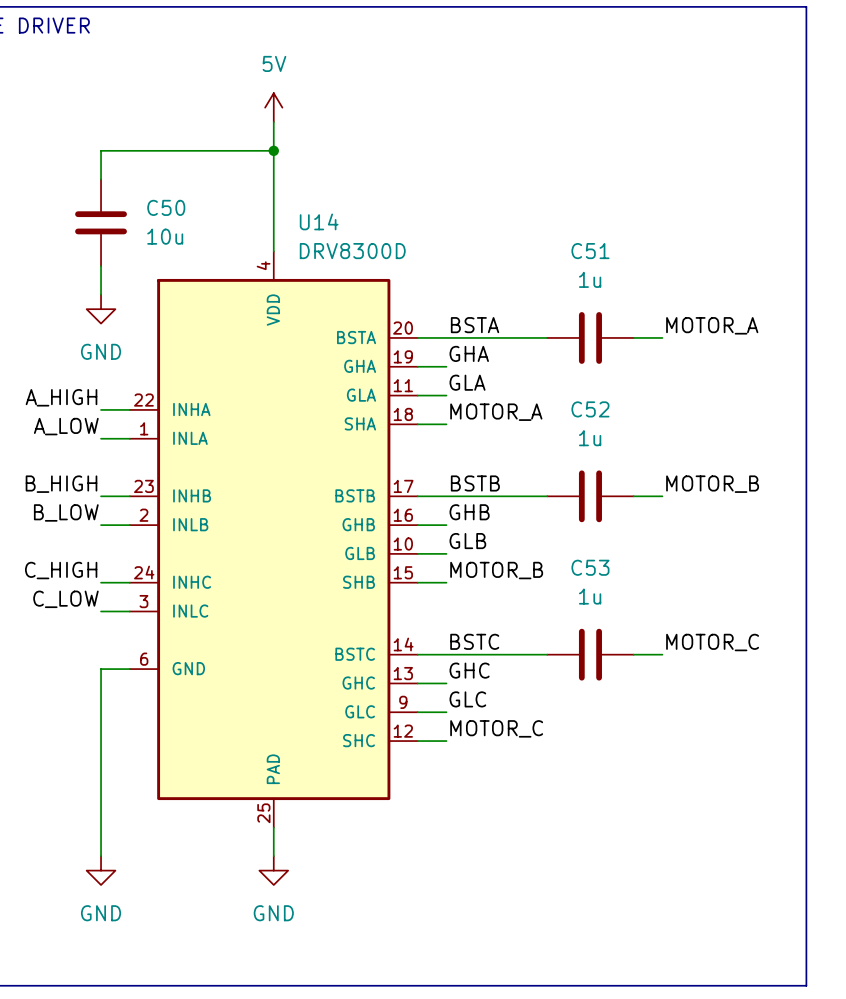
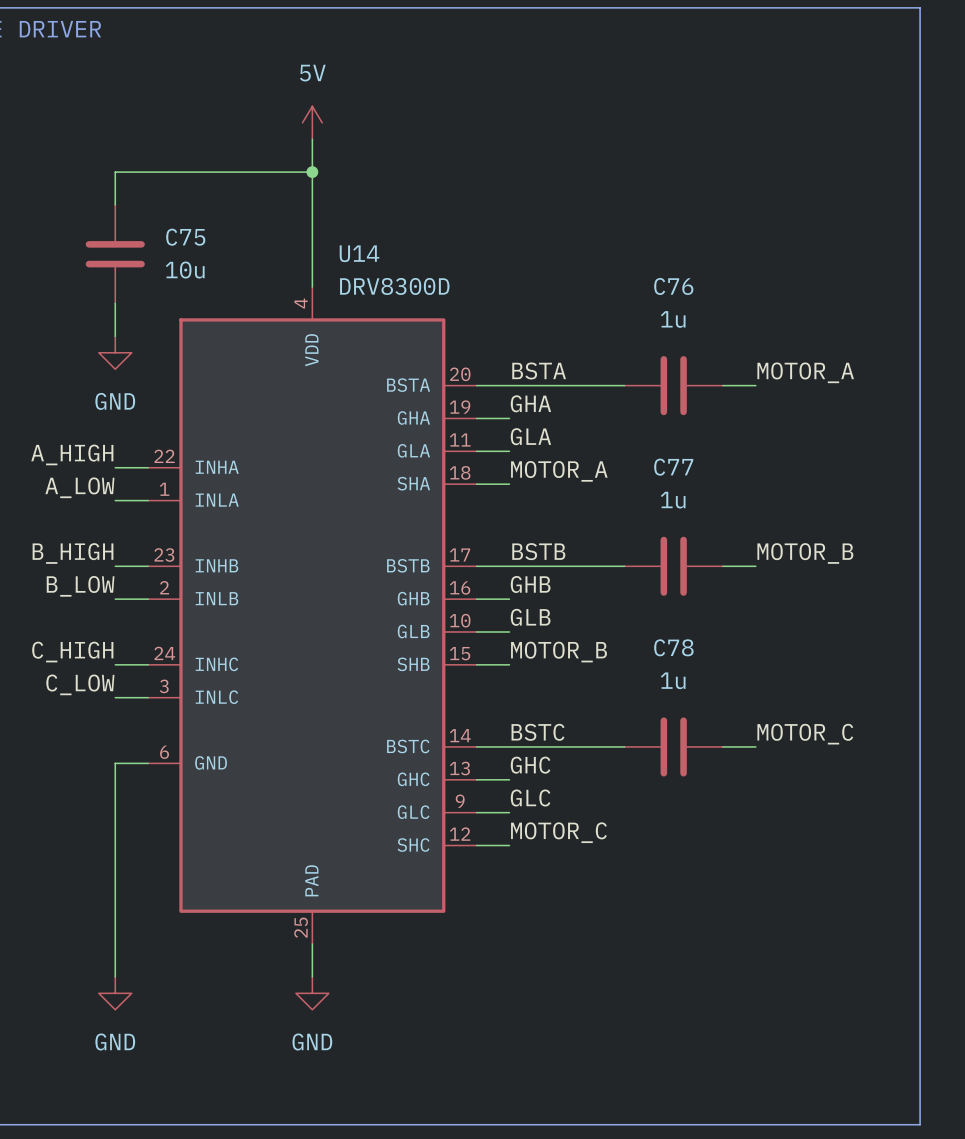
C50 name: C50 (166, 207) -> C75 (185, 237)
C51 name: C51 (590, 251) -> C76 (673, 286)
C52 name: C52 (590, 409) -> C77 (673, 467)
C53 name: C53 (590, 567) -> C78 (673, 647)

